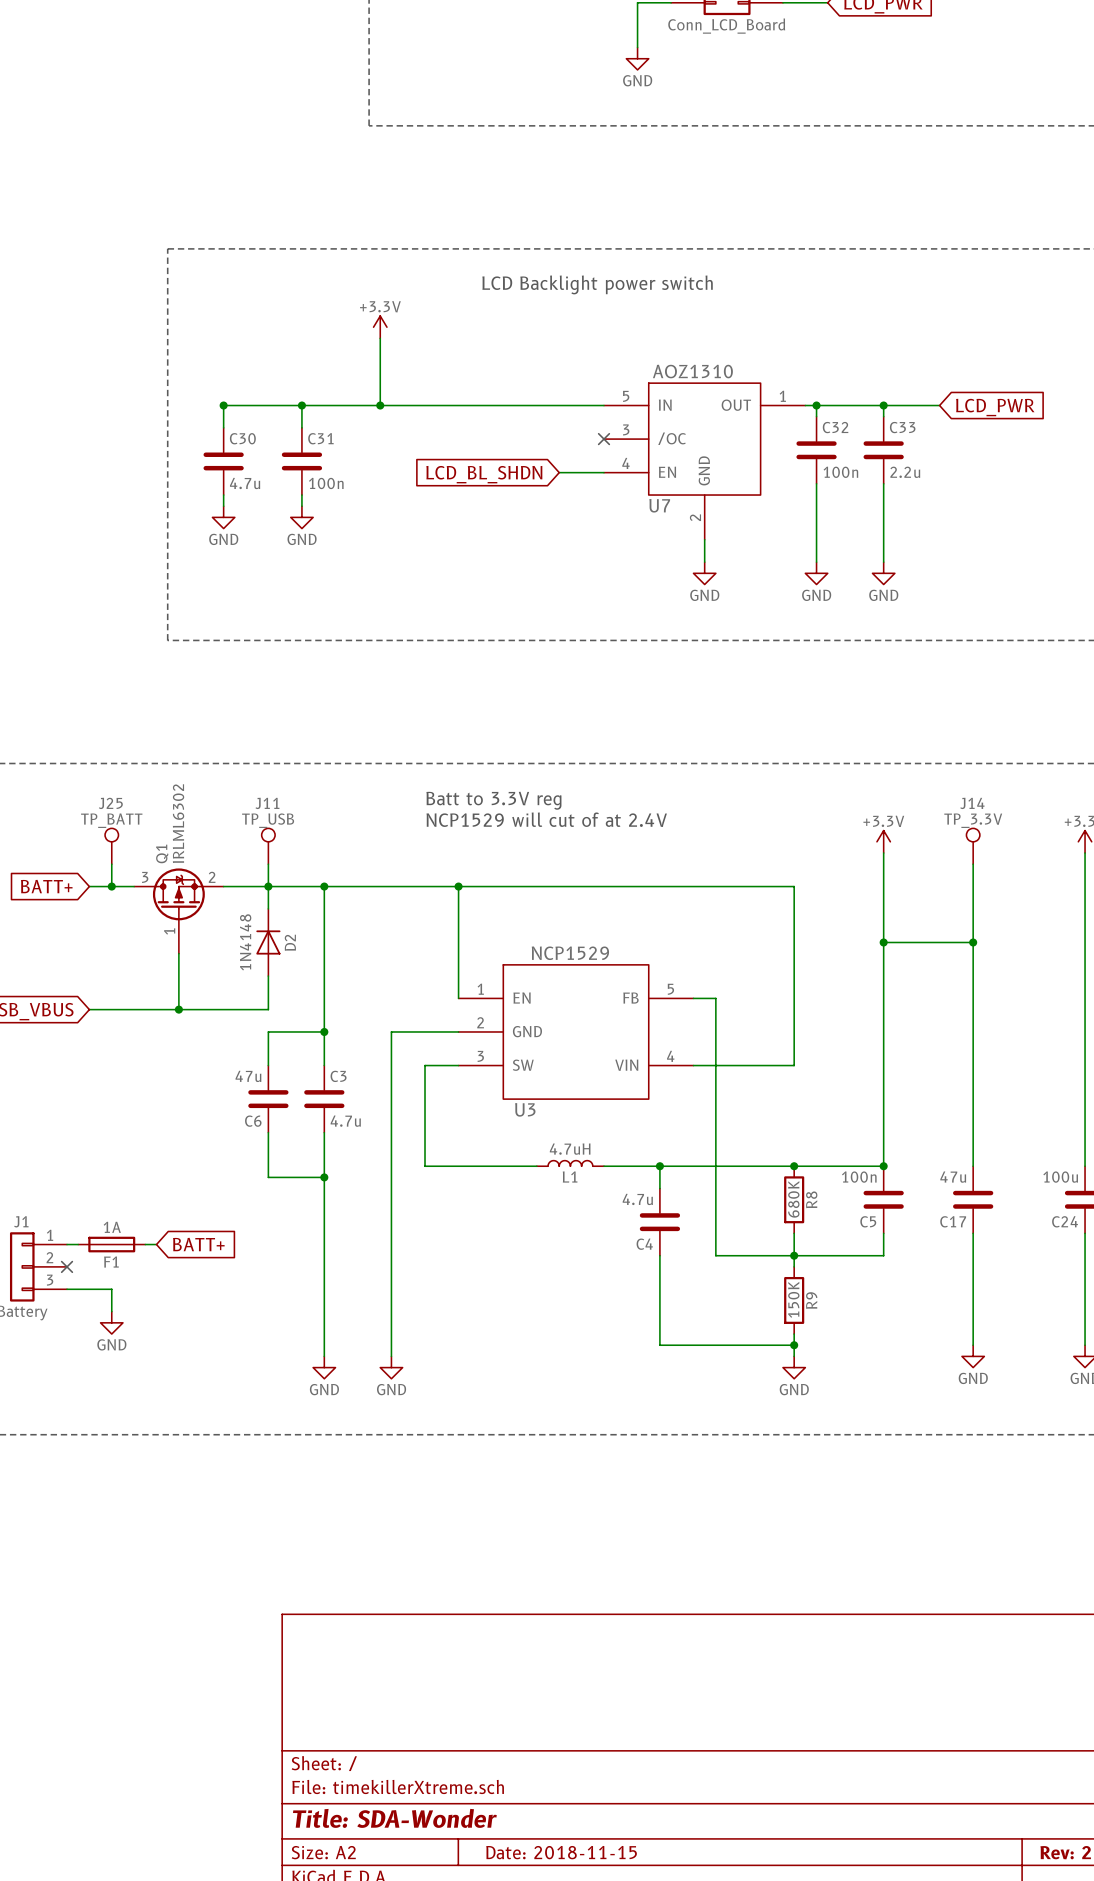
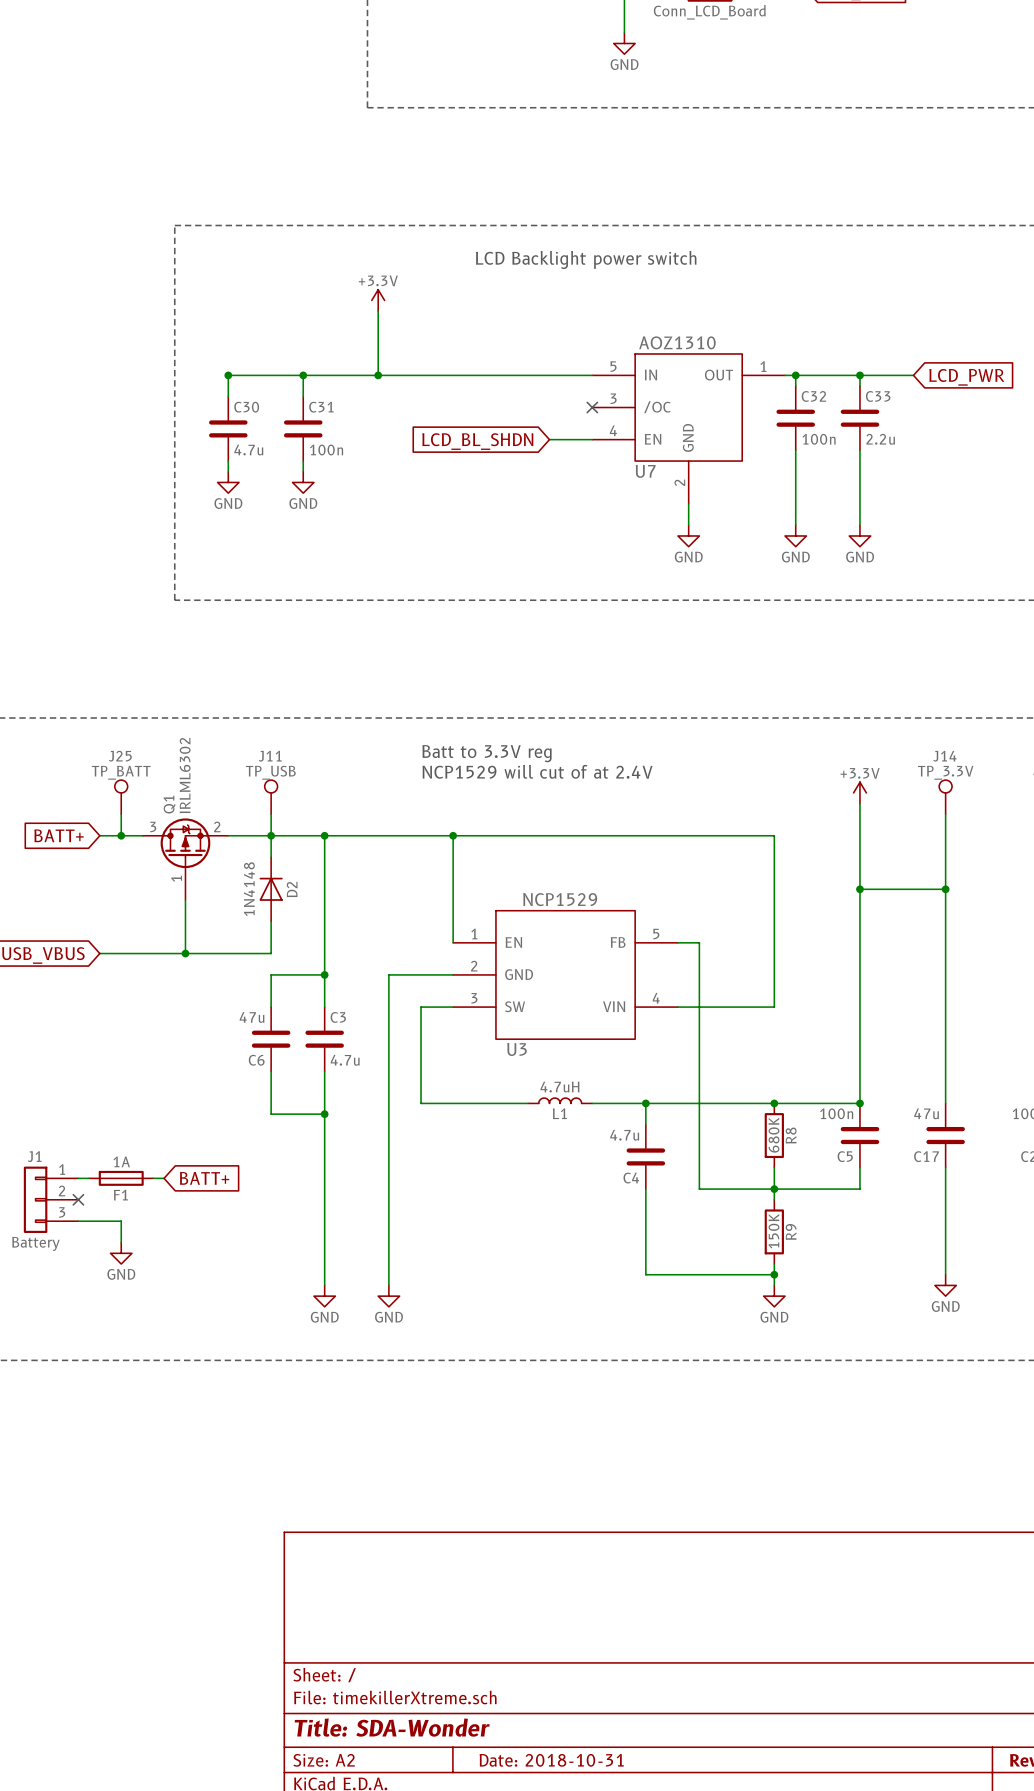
title block: Date: 2018-11-15 (561, 1852) -> Date: 2018-10-31 (551, 1760)

